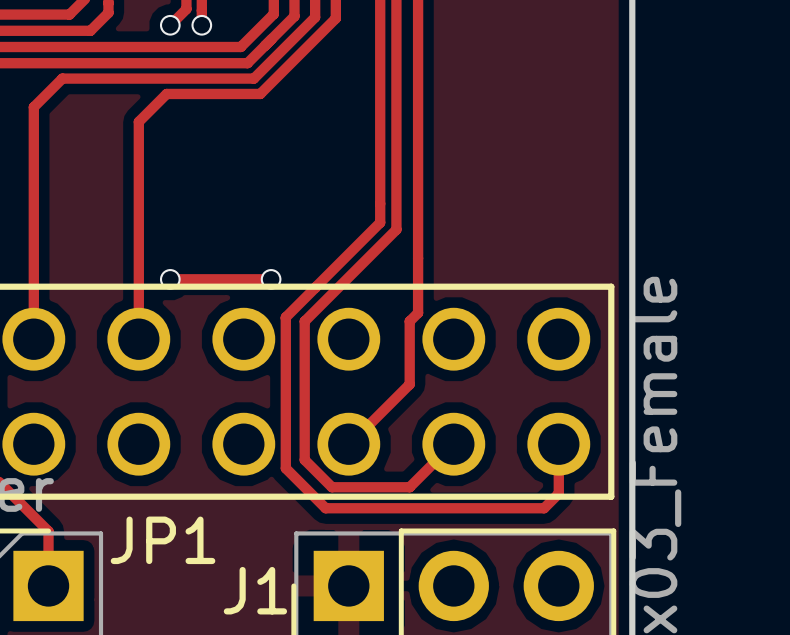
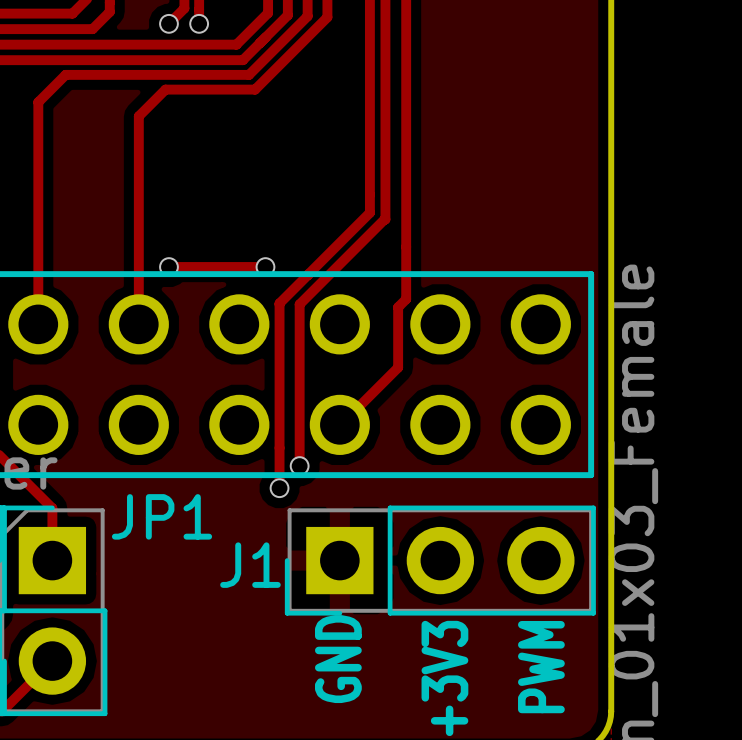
track: (396, 229) (304, 321) (304, 459) (332, 487) (409, 487) (453, 444) -> (385, 219) (299, 304) (299, 466)
track: (558, 444) (558, 493) (544, 508) (325, 508) (285, 468) -> (279, 488) (279, 447)
via: none -> (299, 466)
via: none -> (279, 488)

